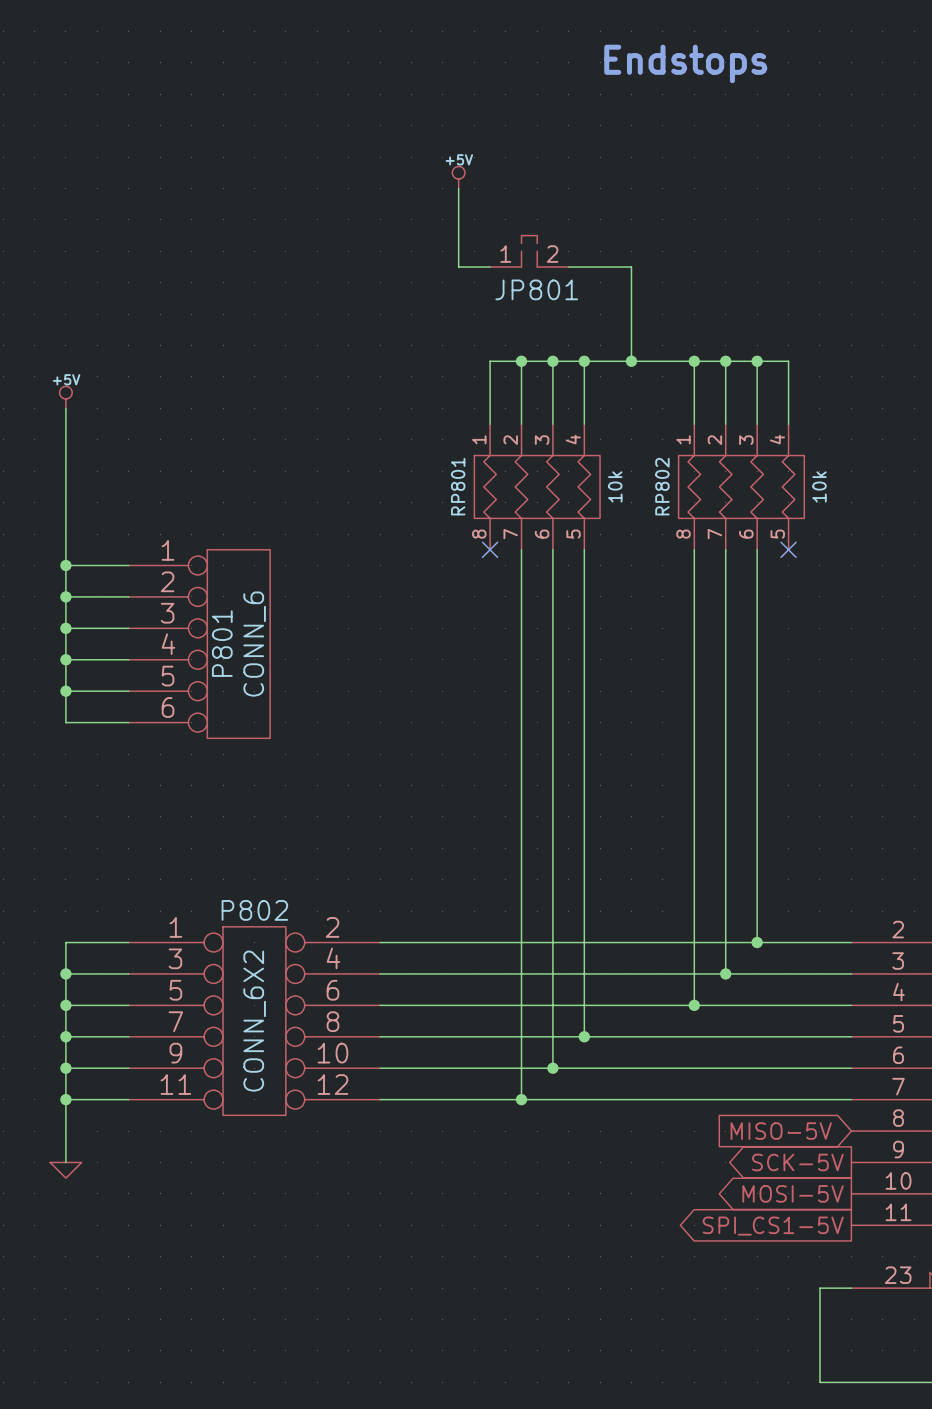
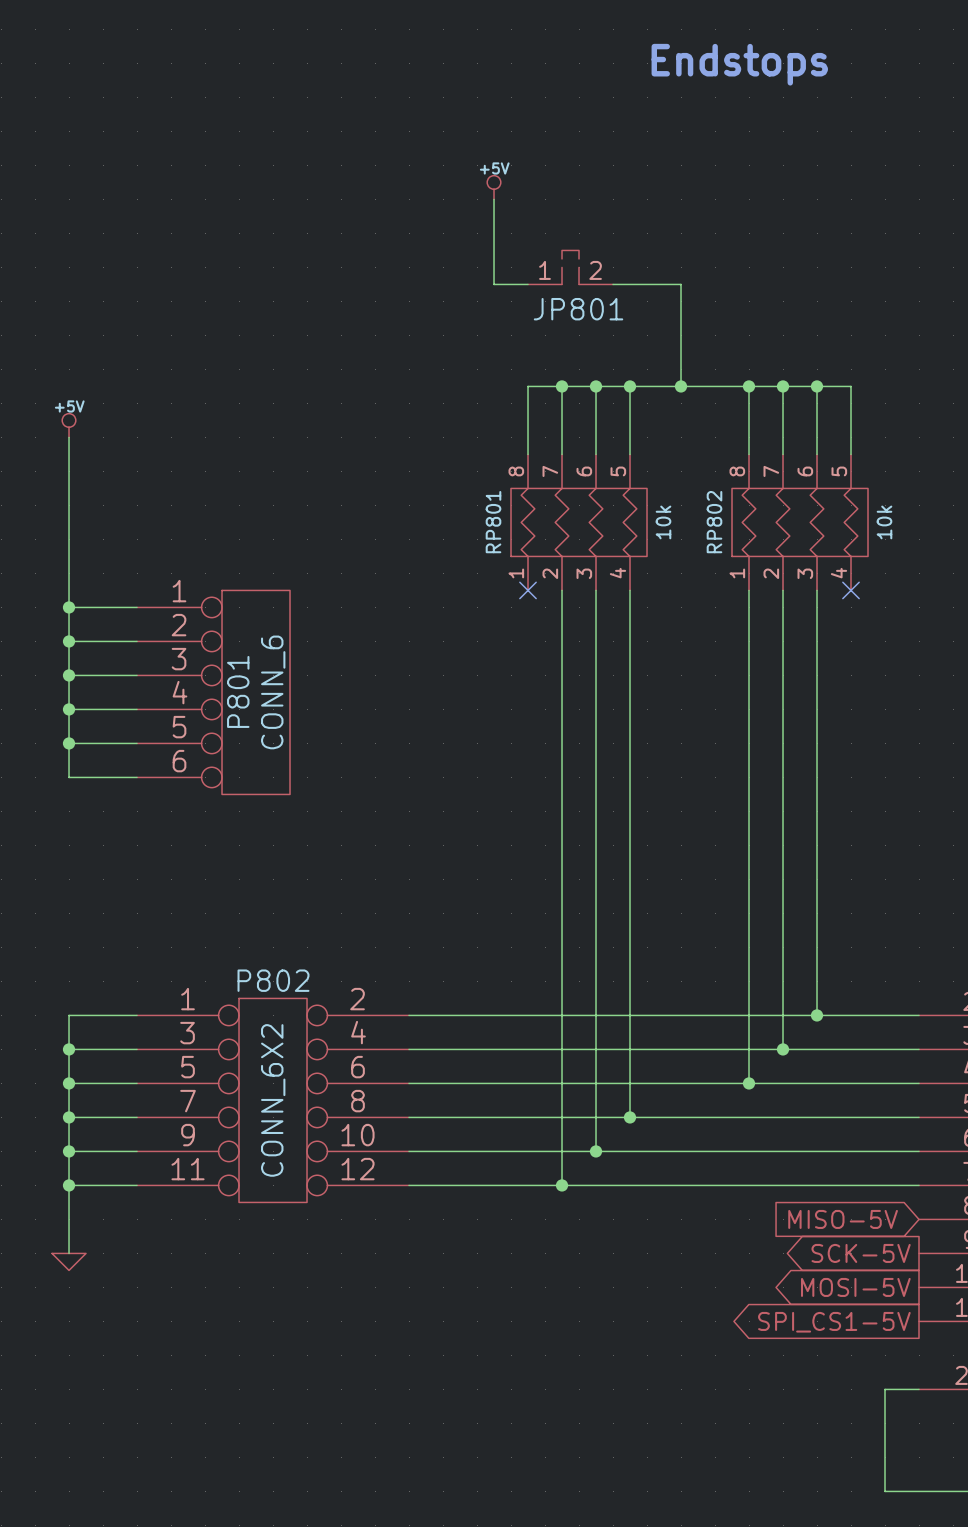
RP801 flip: as is (537, 486) -> up-down (579, 522)
RP802 flip: as is (741, 486) -> up-down (800, 522)

